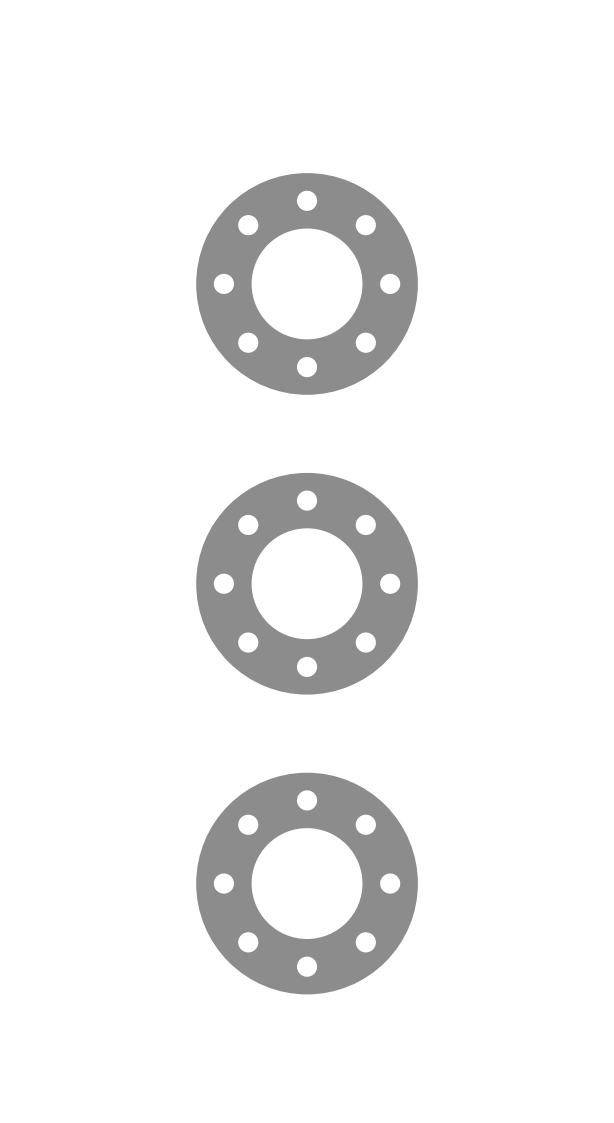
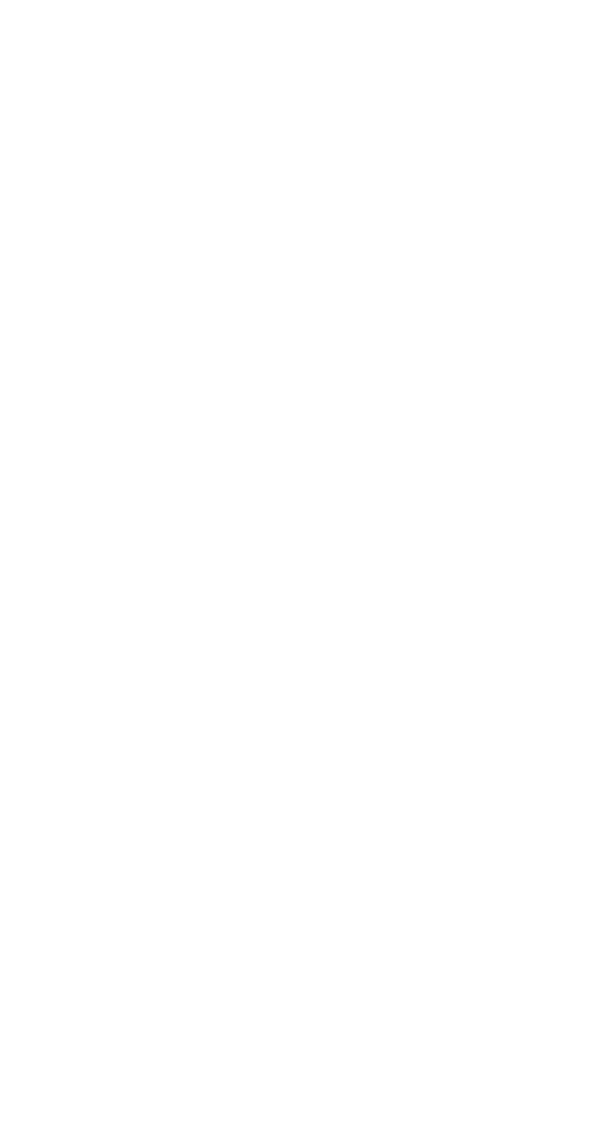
part: (307, 283) -> none
part: (307, 583) -> none
part: (307, 883) -> none

